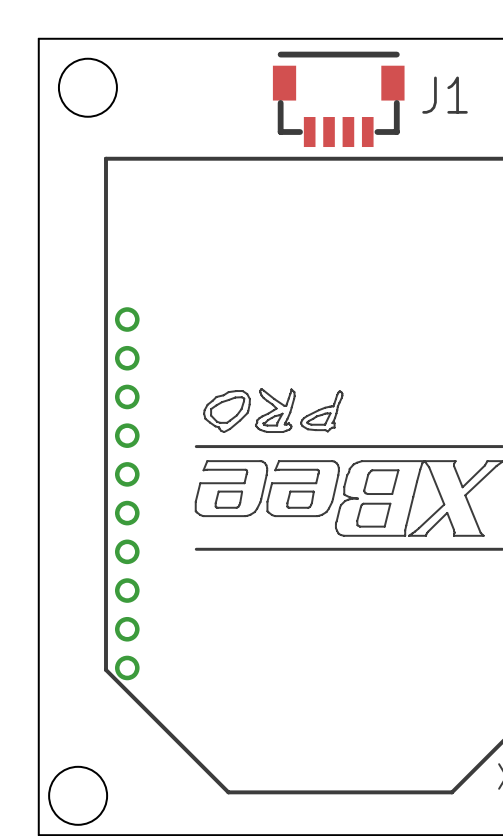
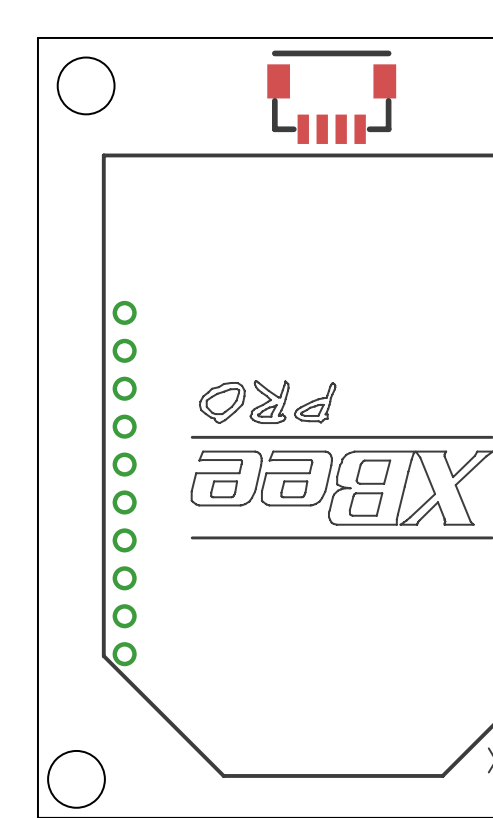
text: J1 (445, 95) -> none

